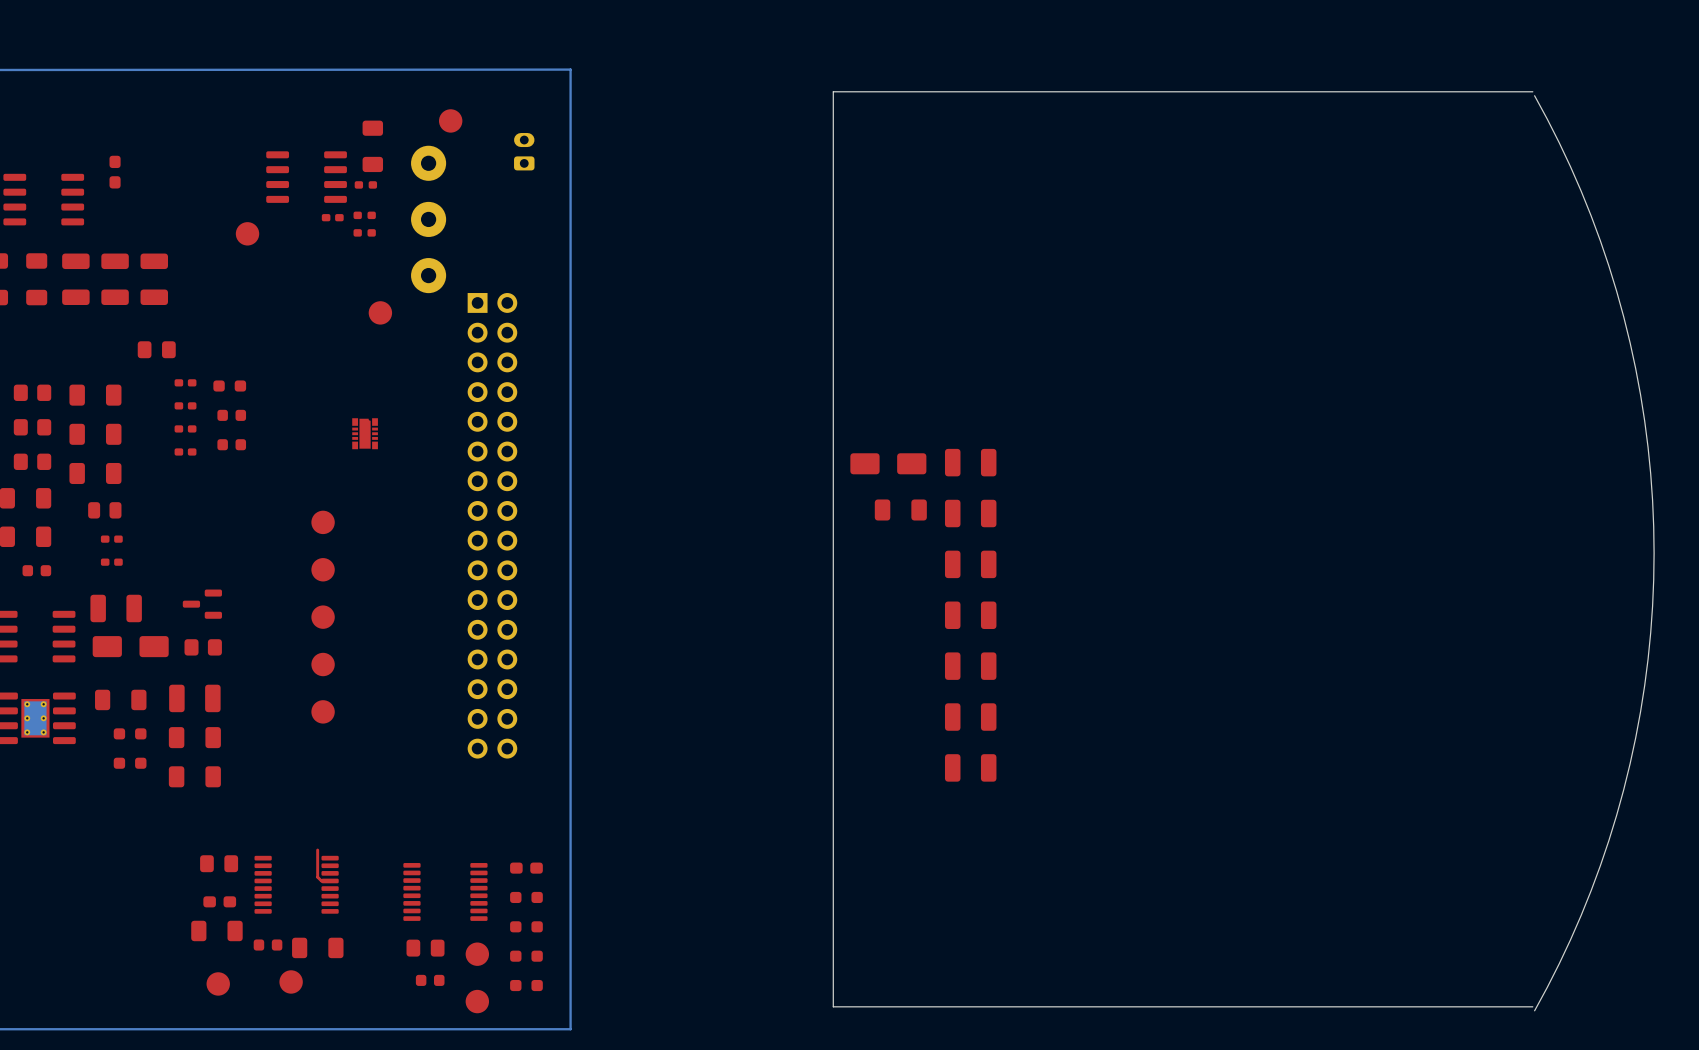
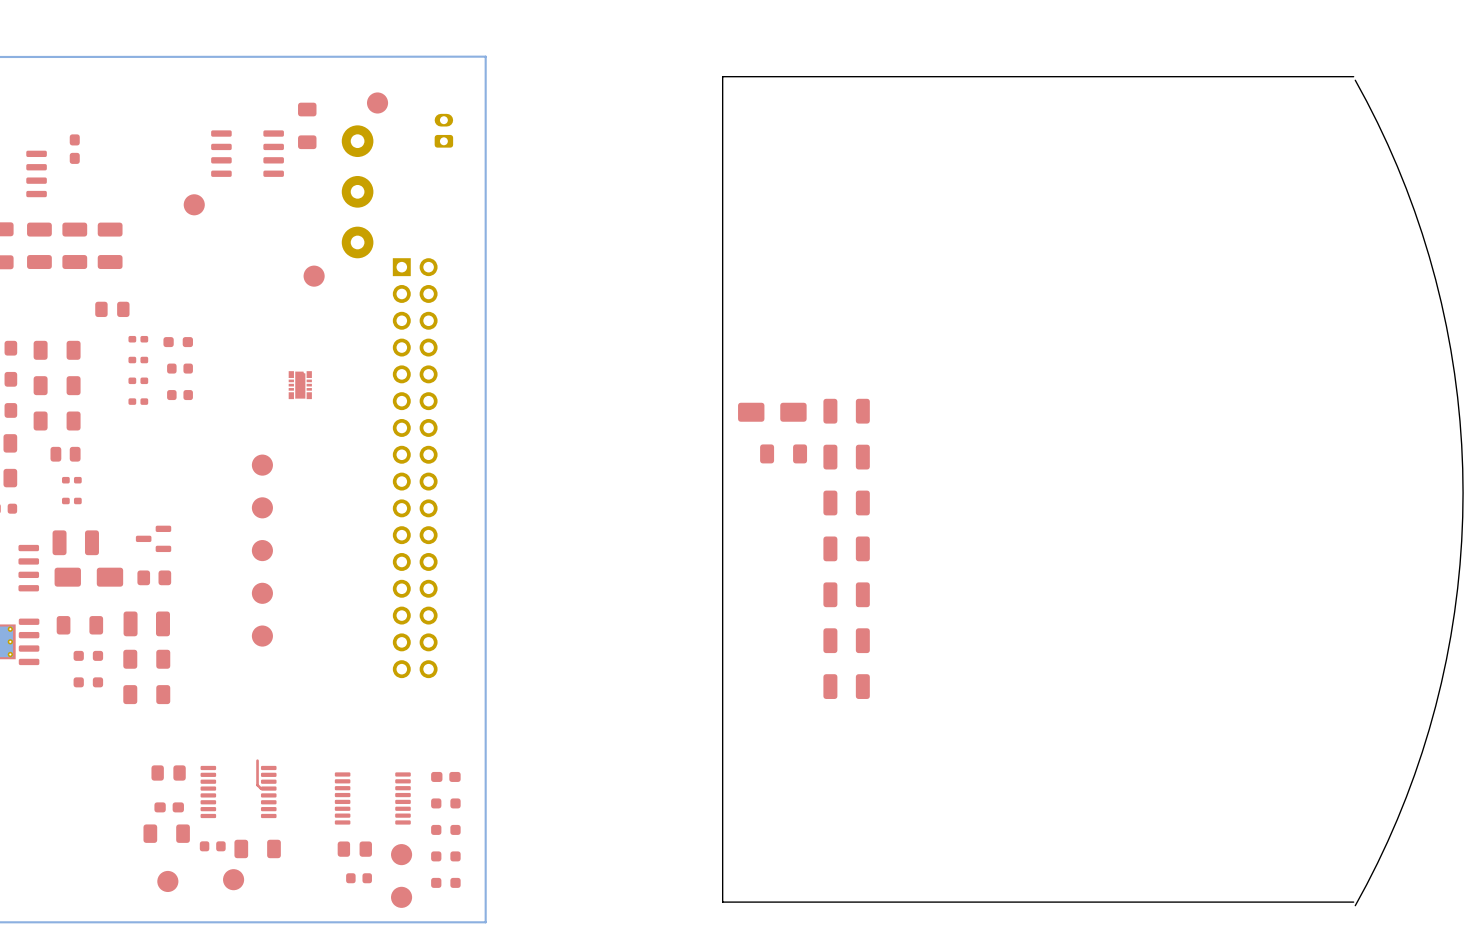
part: (365, 184) -> none
part: (364, 215) -> none
part: (332, 217) -> none
part: (364, 232) -> none

